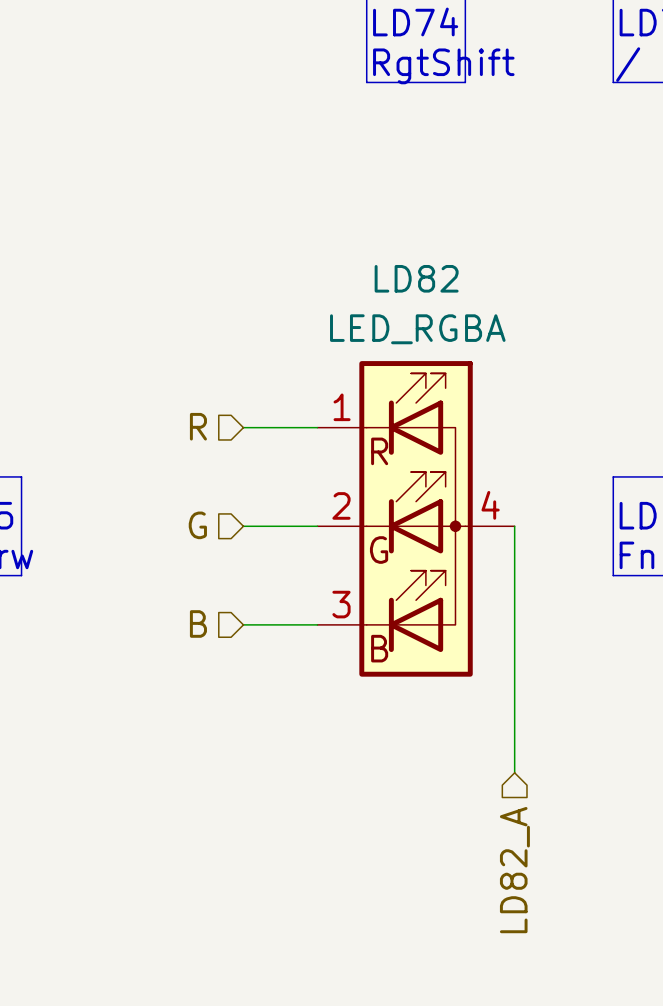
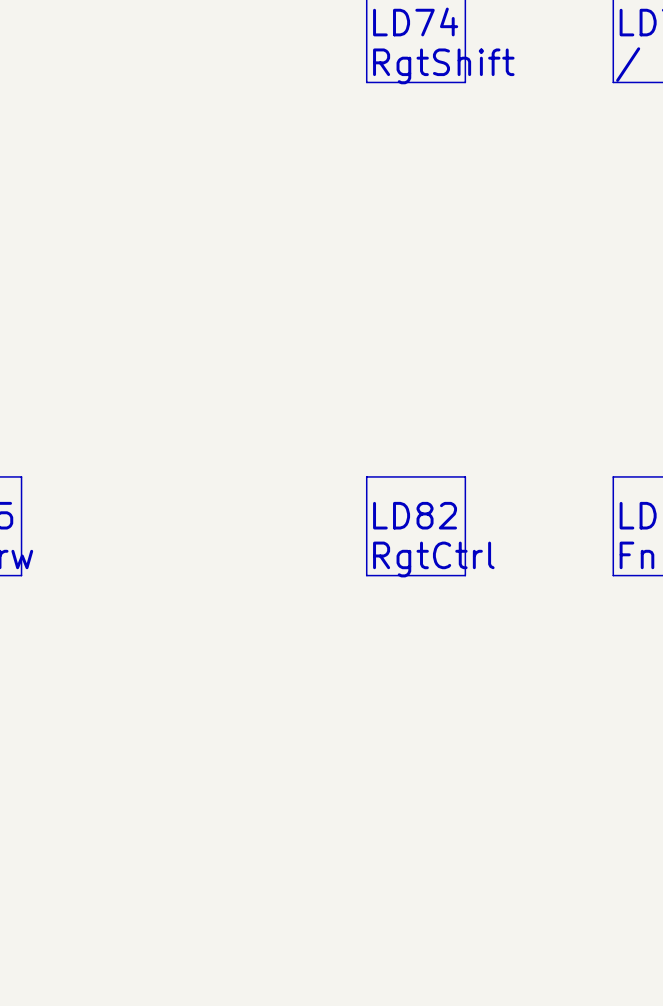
hierarchical label: R (198, 426) -> none
wire: (243, 427) (317, 427) -> none
line: none -> (366, 476) (465, 476) (465, 575) (366, 575) (366, 476)
text: none -> LD82 (415, 515)
LD82: LED_RGBA (416, 518) -> none
hierarchical label: G (197, 525) -> none
wire: (243, 526) (317, 526) -> none
wire: (514, 526) (514, 772) -> none
text: none -> RgtCtrl (433, 559)
hierarchical label: B (198, 623) -> none
wire: (243, 624) (317, 624) -> none
hierarchical label: LD82_A (514, 870) -> none

